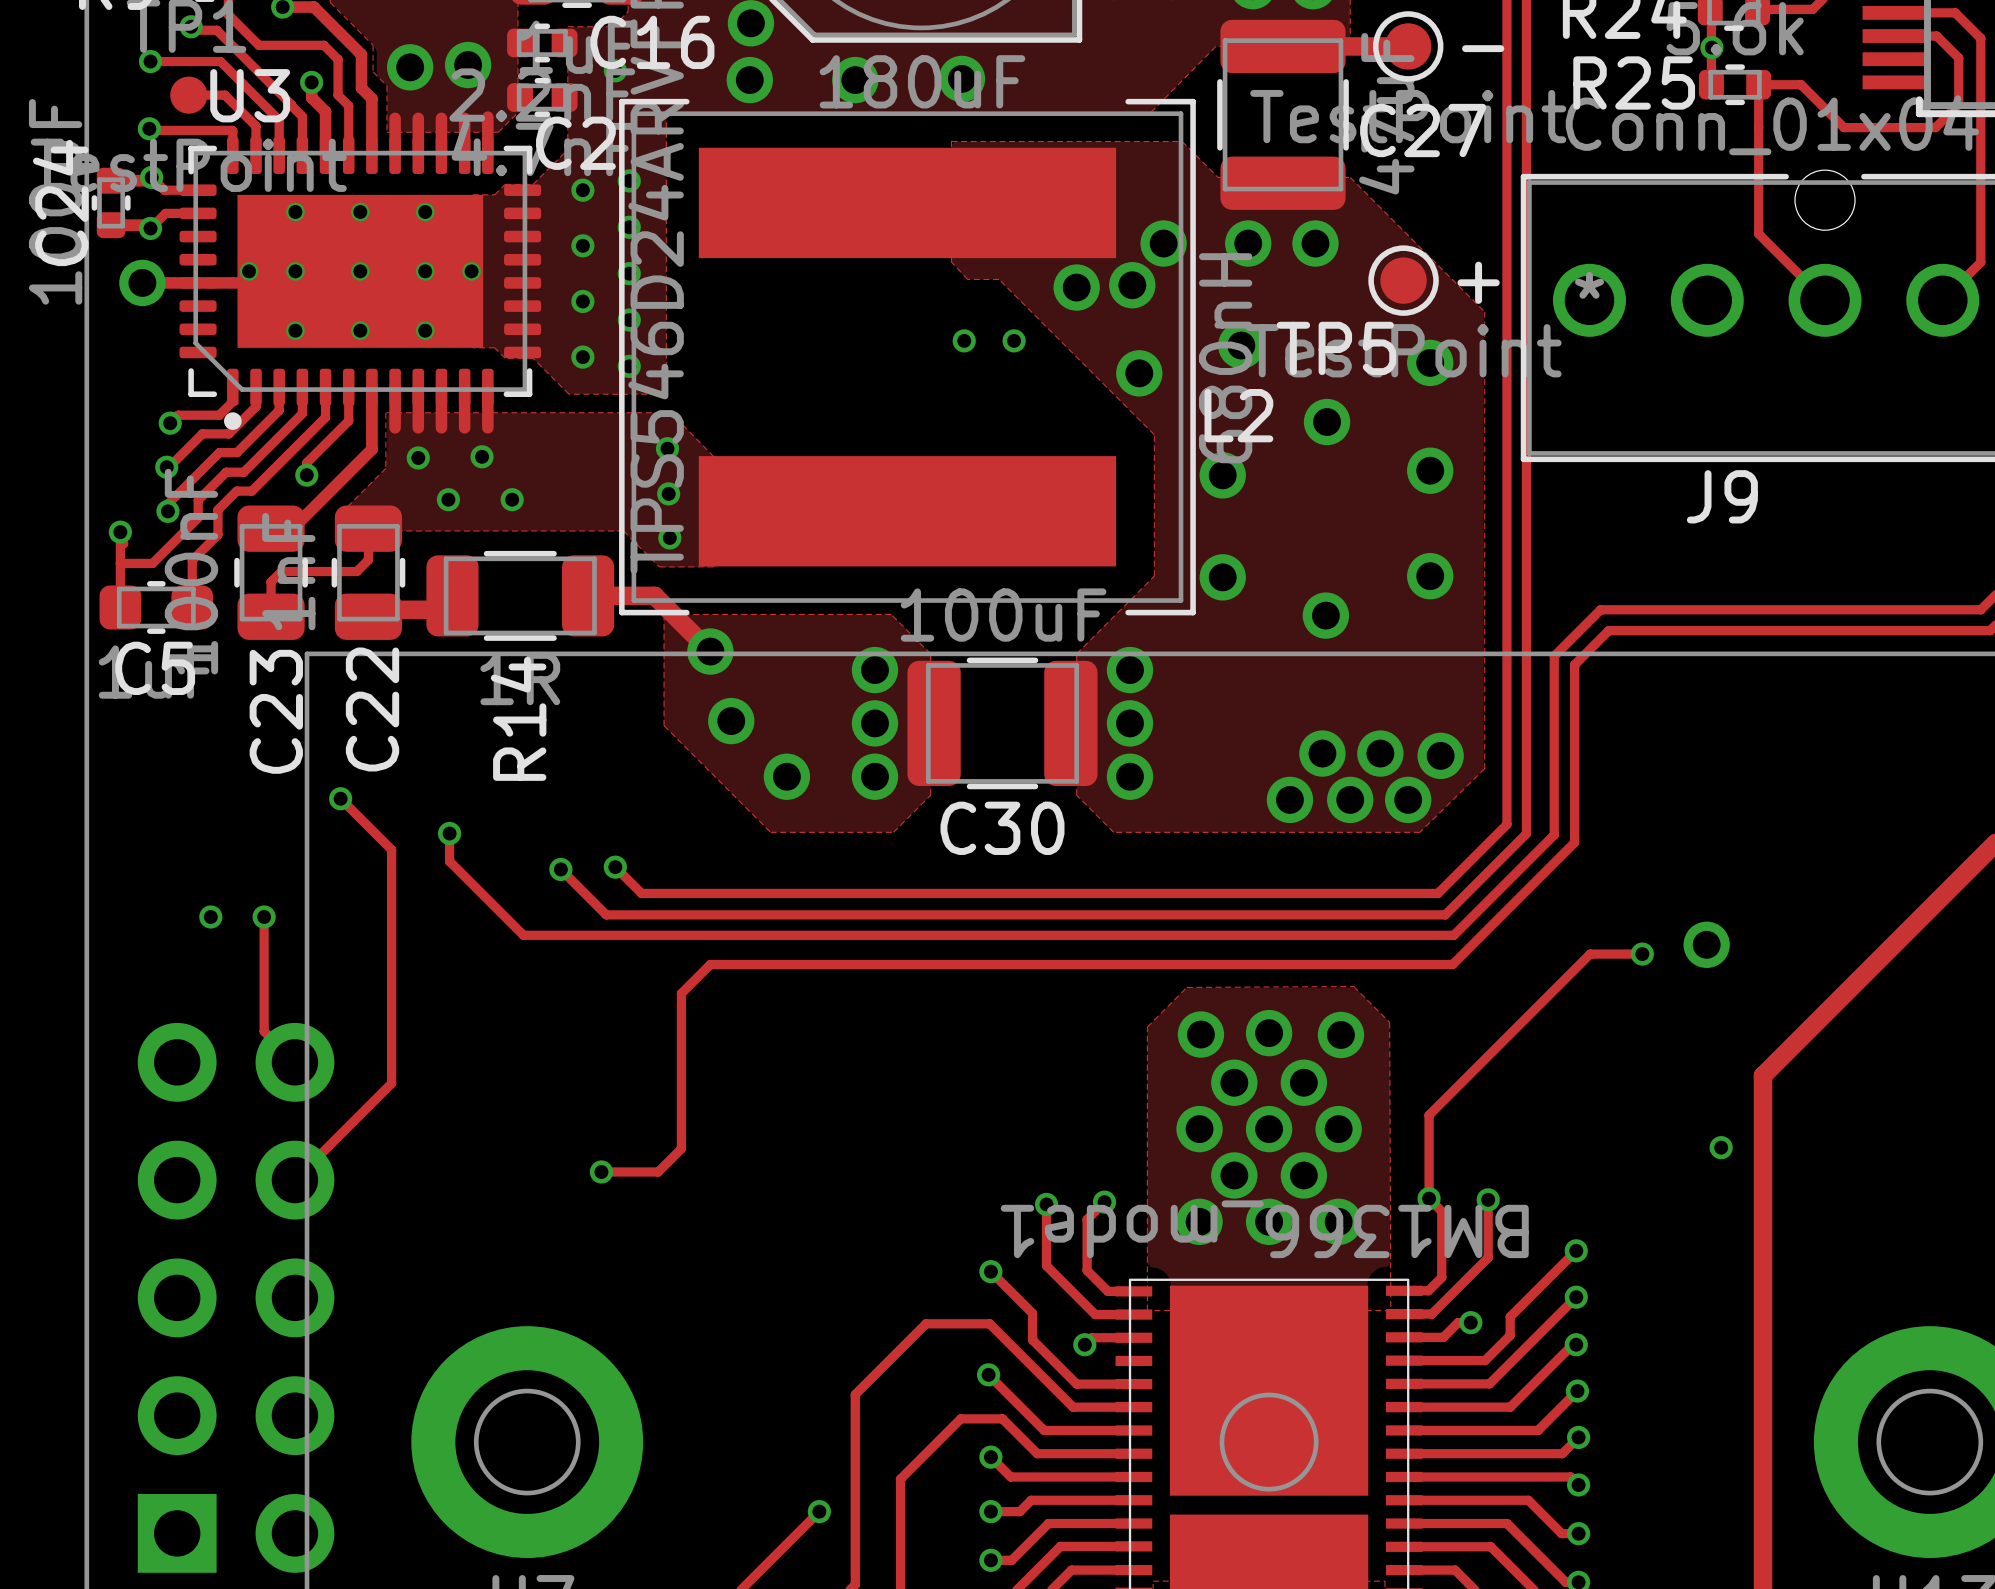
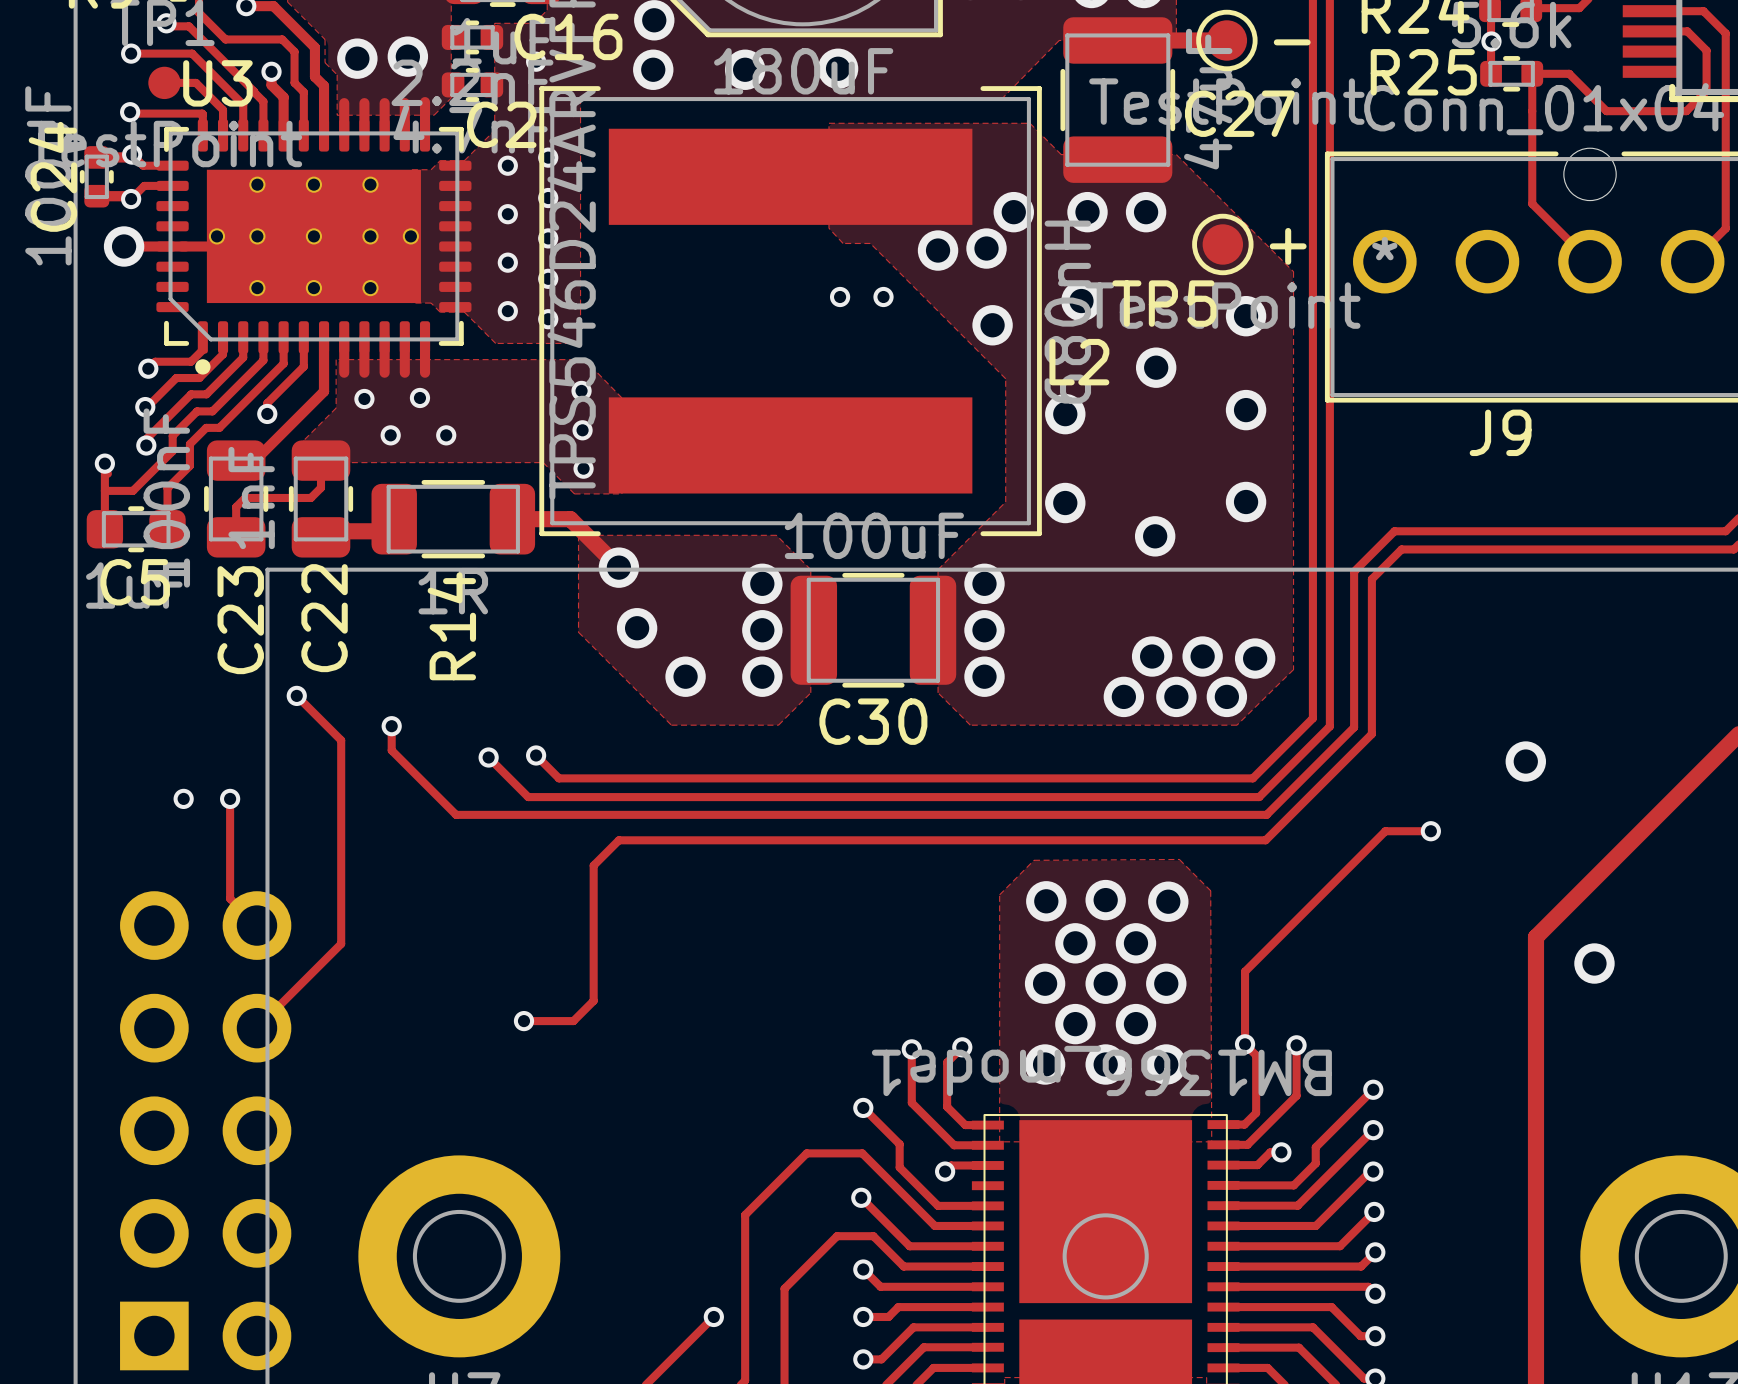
via position: (1706, 944) -> (1525, 761)
via: none -> (1594, 963)
via: (1721, 1147) -> none

